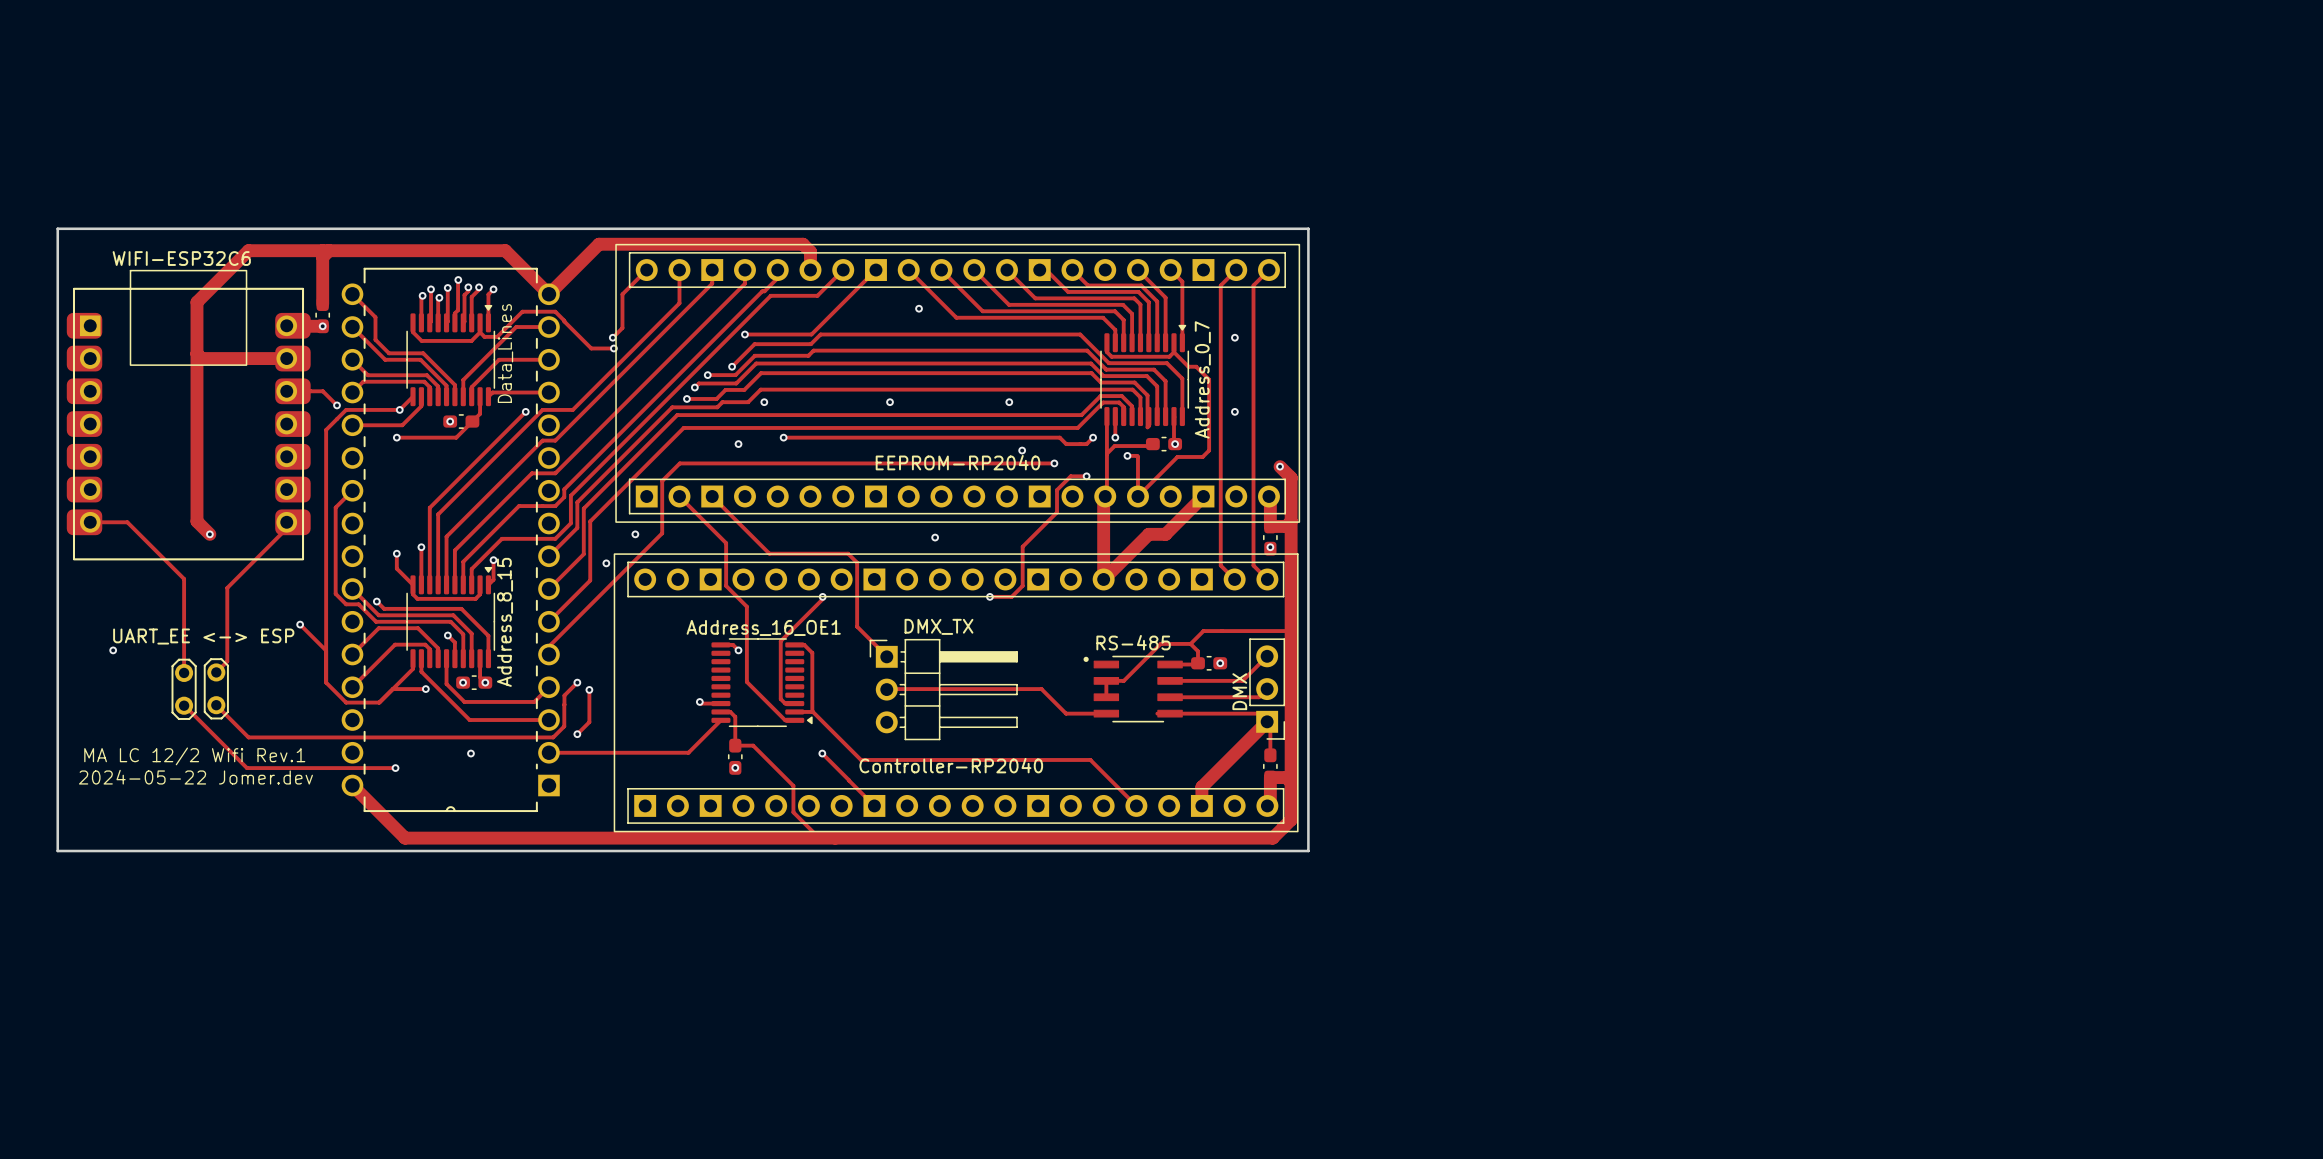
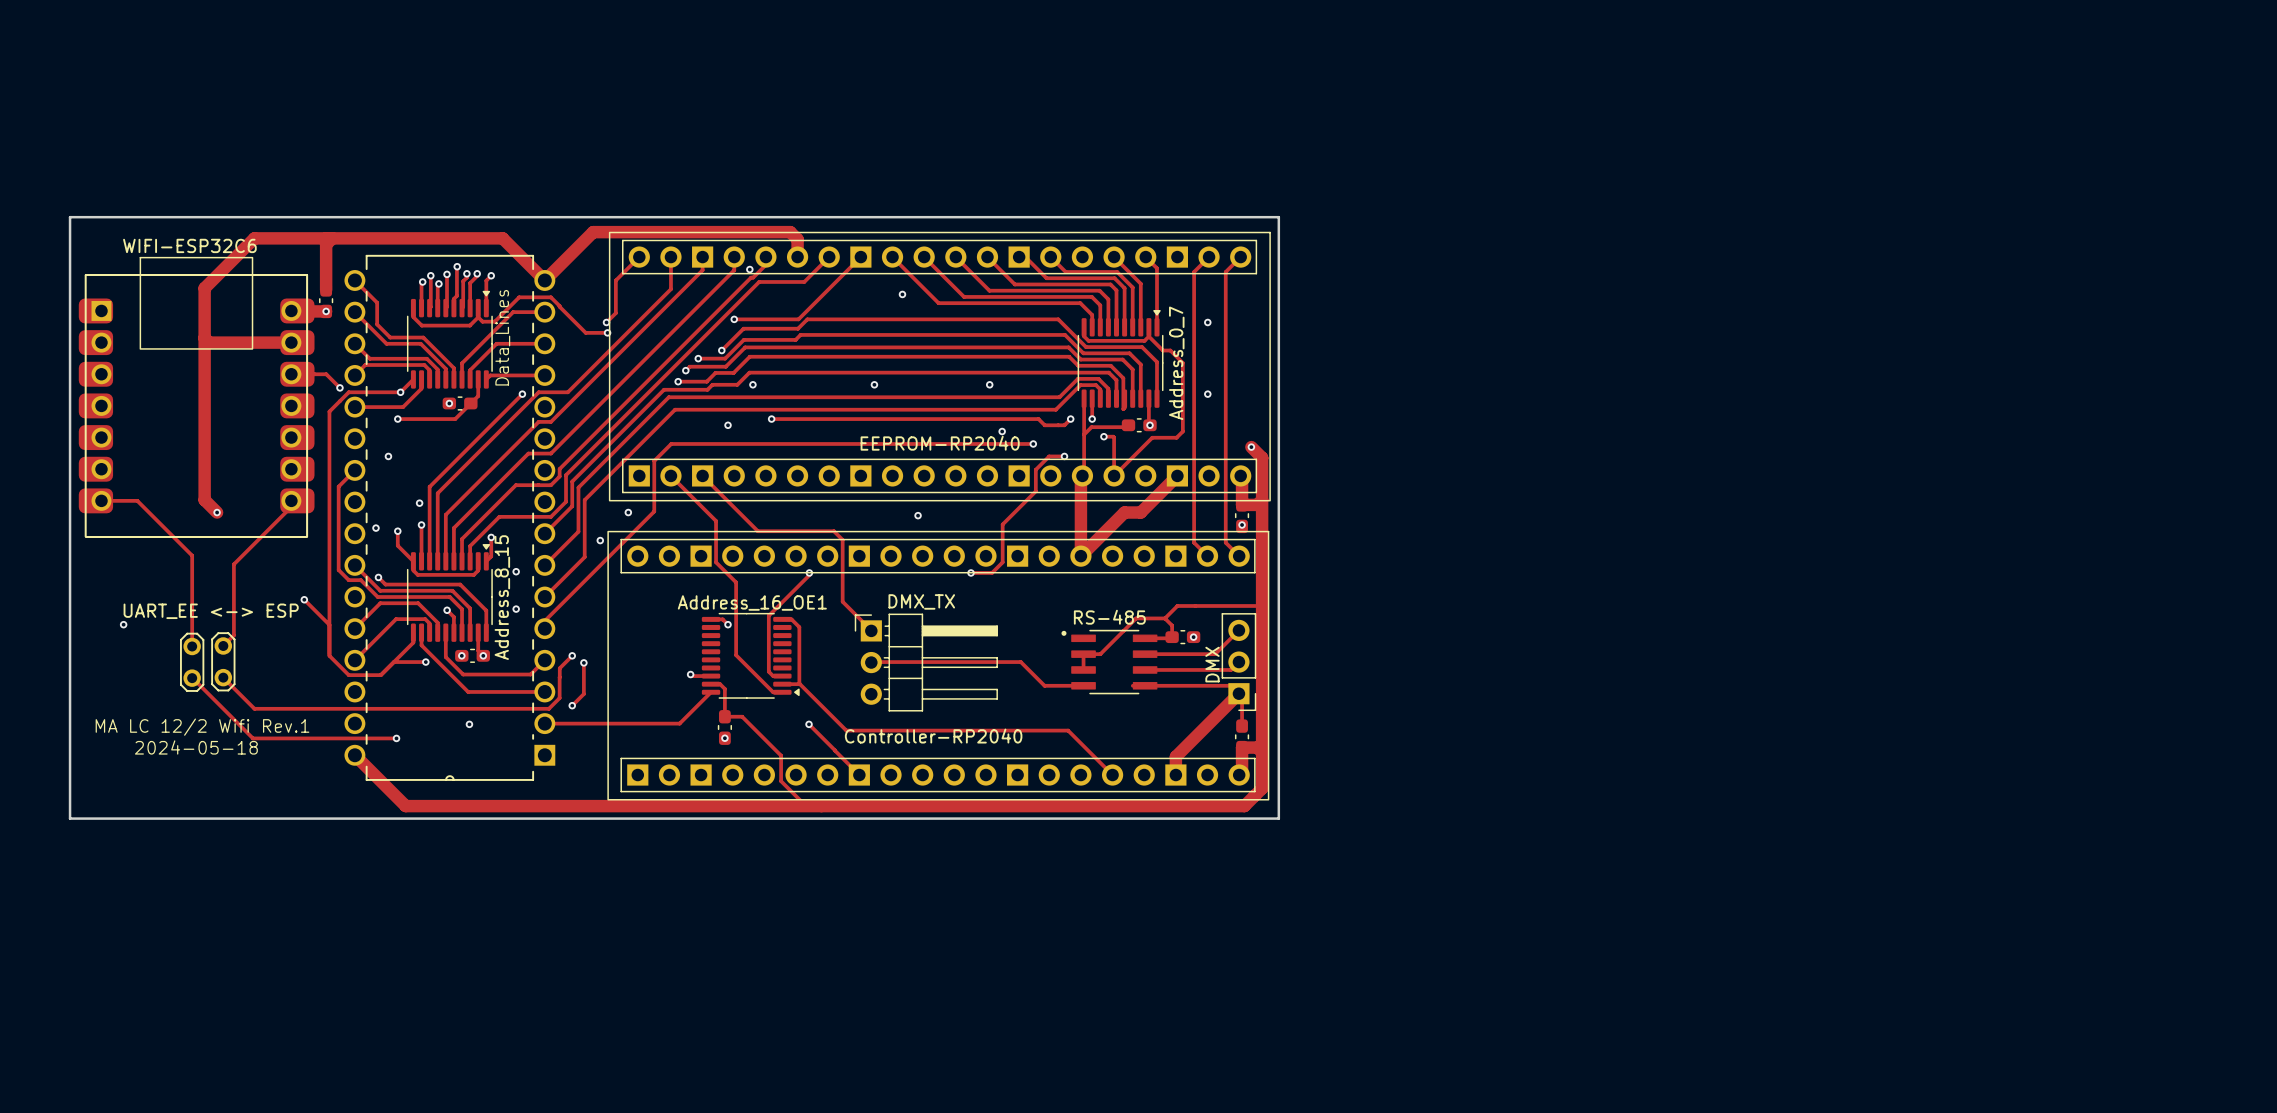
via: none -> (749, 269)
via: none -> (388, 456)
via: none -> (419, 503)
via: none -> (375, 528)
via: none -> (516, 571)
via: none -> (516, 609)
text: none -> 2024-05-18 (196, 747)
text: 2024-05-22 Jomer.dev (195, 777) -> none

